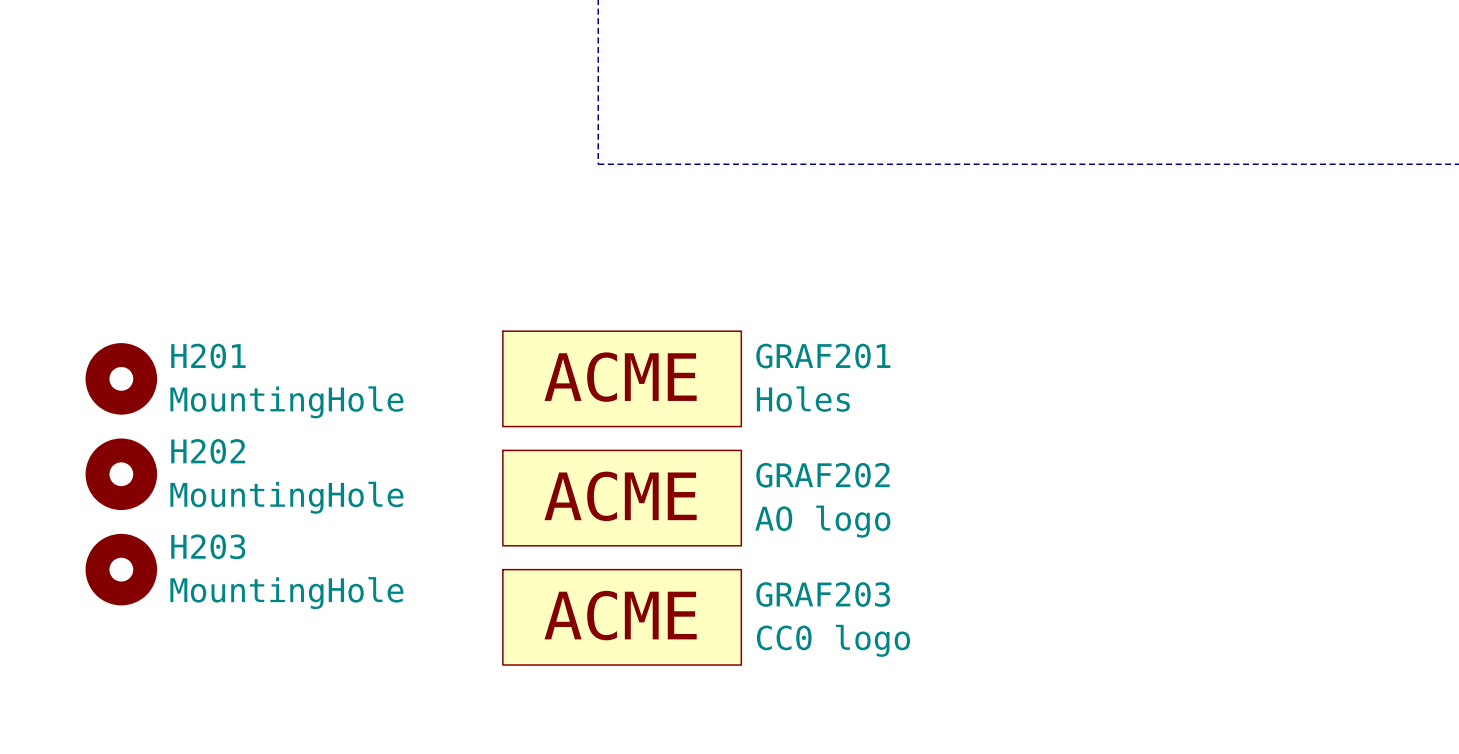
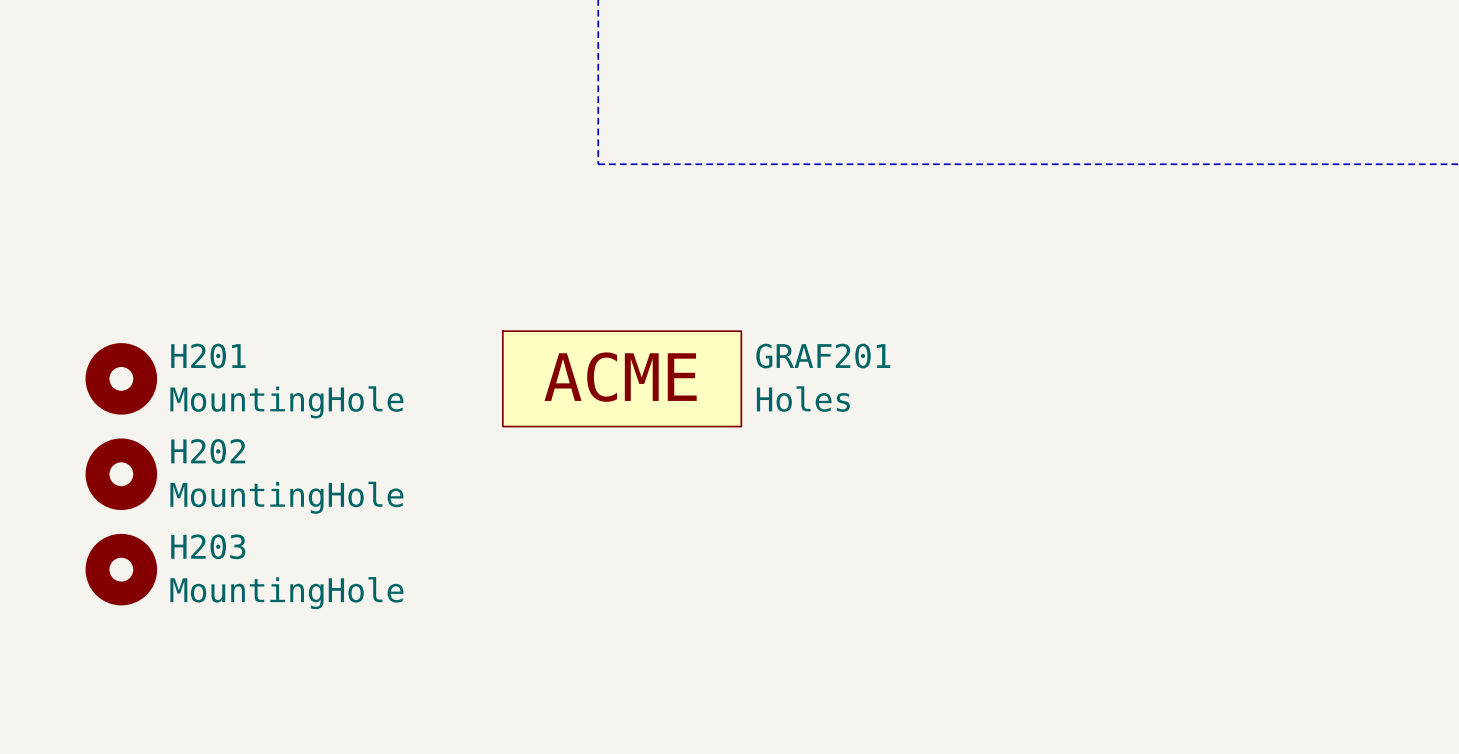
GRAF202: AO logo (622, 498) -> none
GRAF203: CC0 logo (622, 617) -> none

